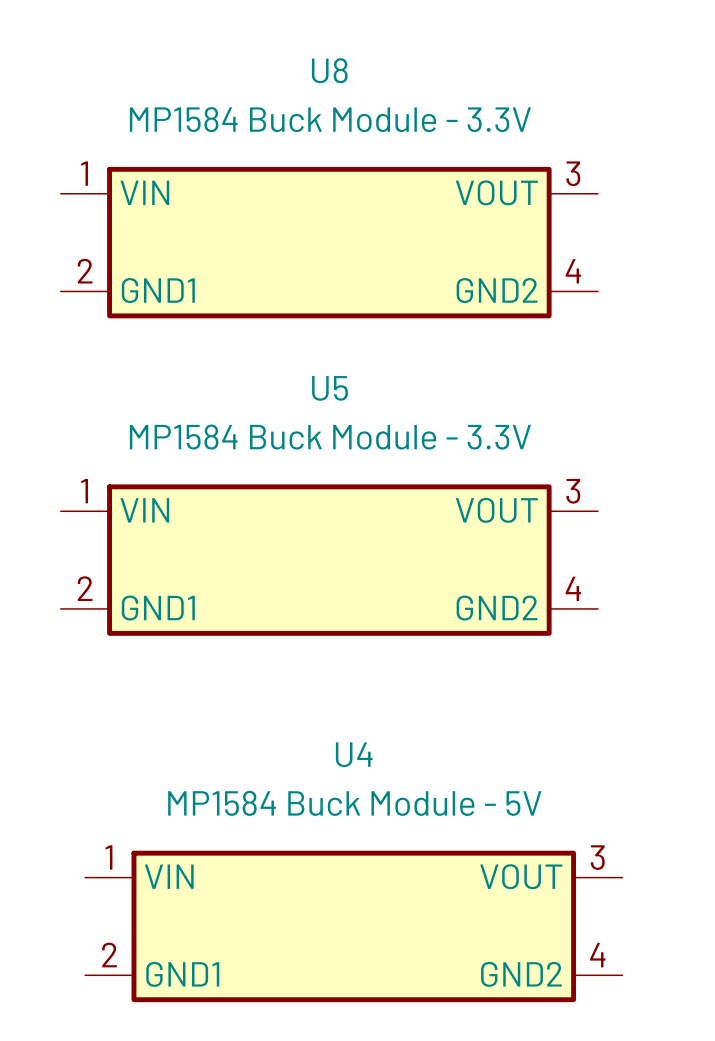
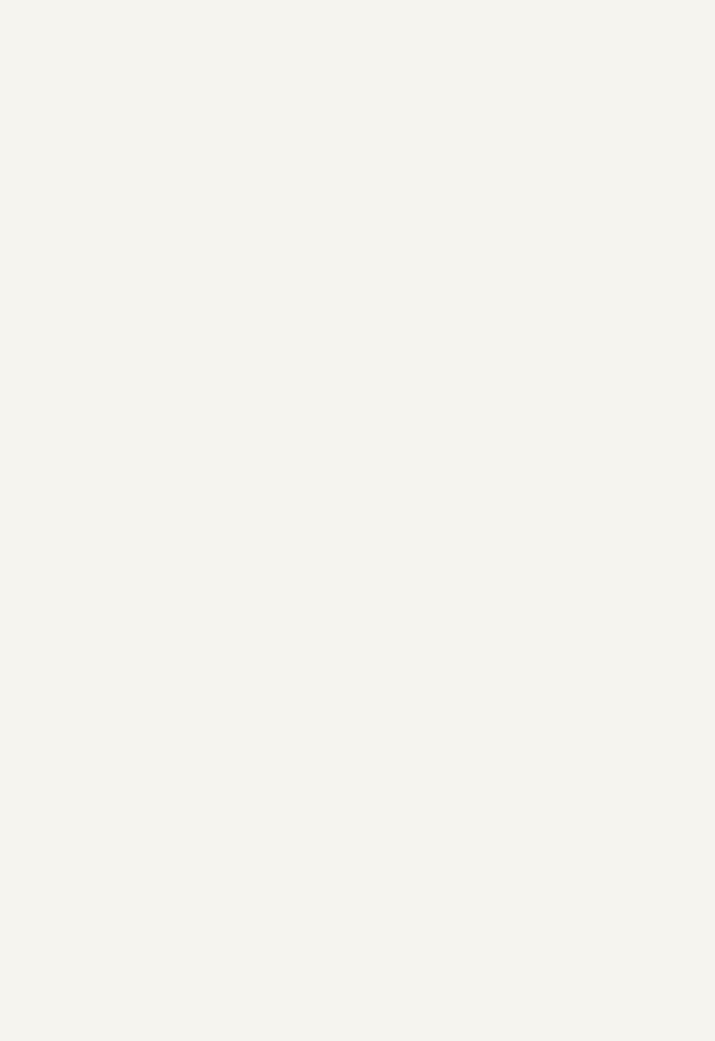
U8: MP1584 Buck Module - 3.3V (329, 242) -> none
U5: MP1584 Buck Module - 3.3V (329, 560) -> none
U4: MP1584 Buck Module - 5V (353, 926) -> none

